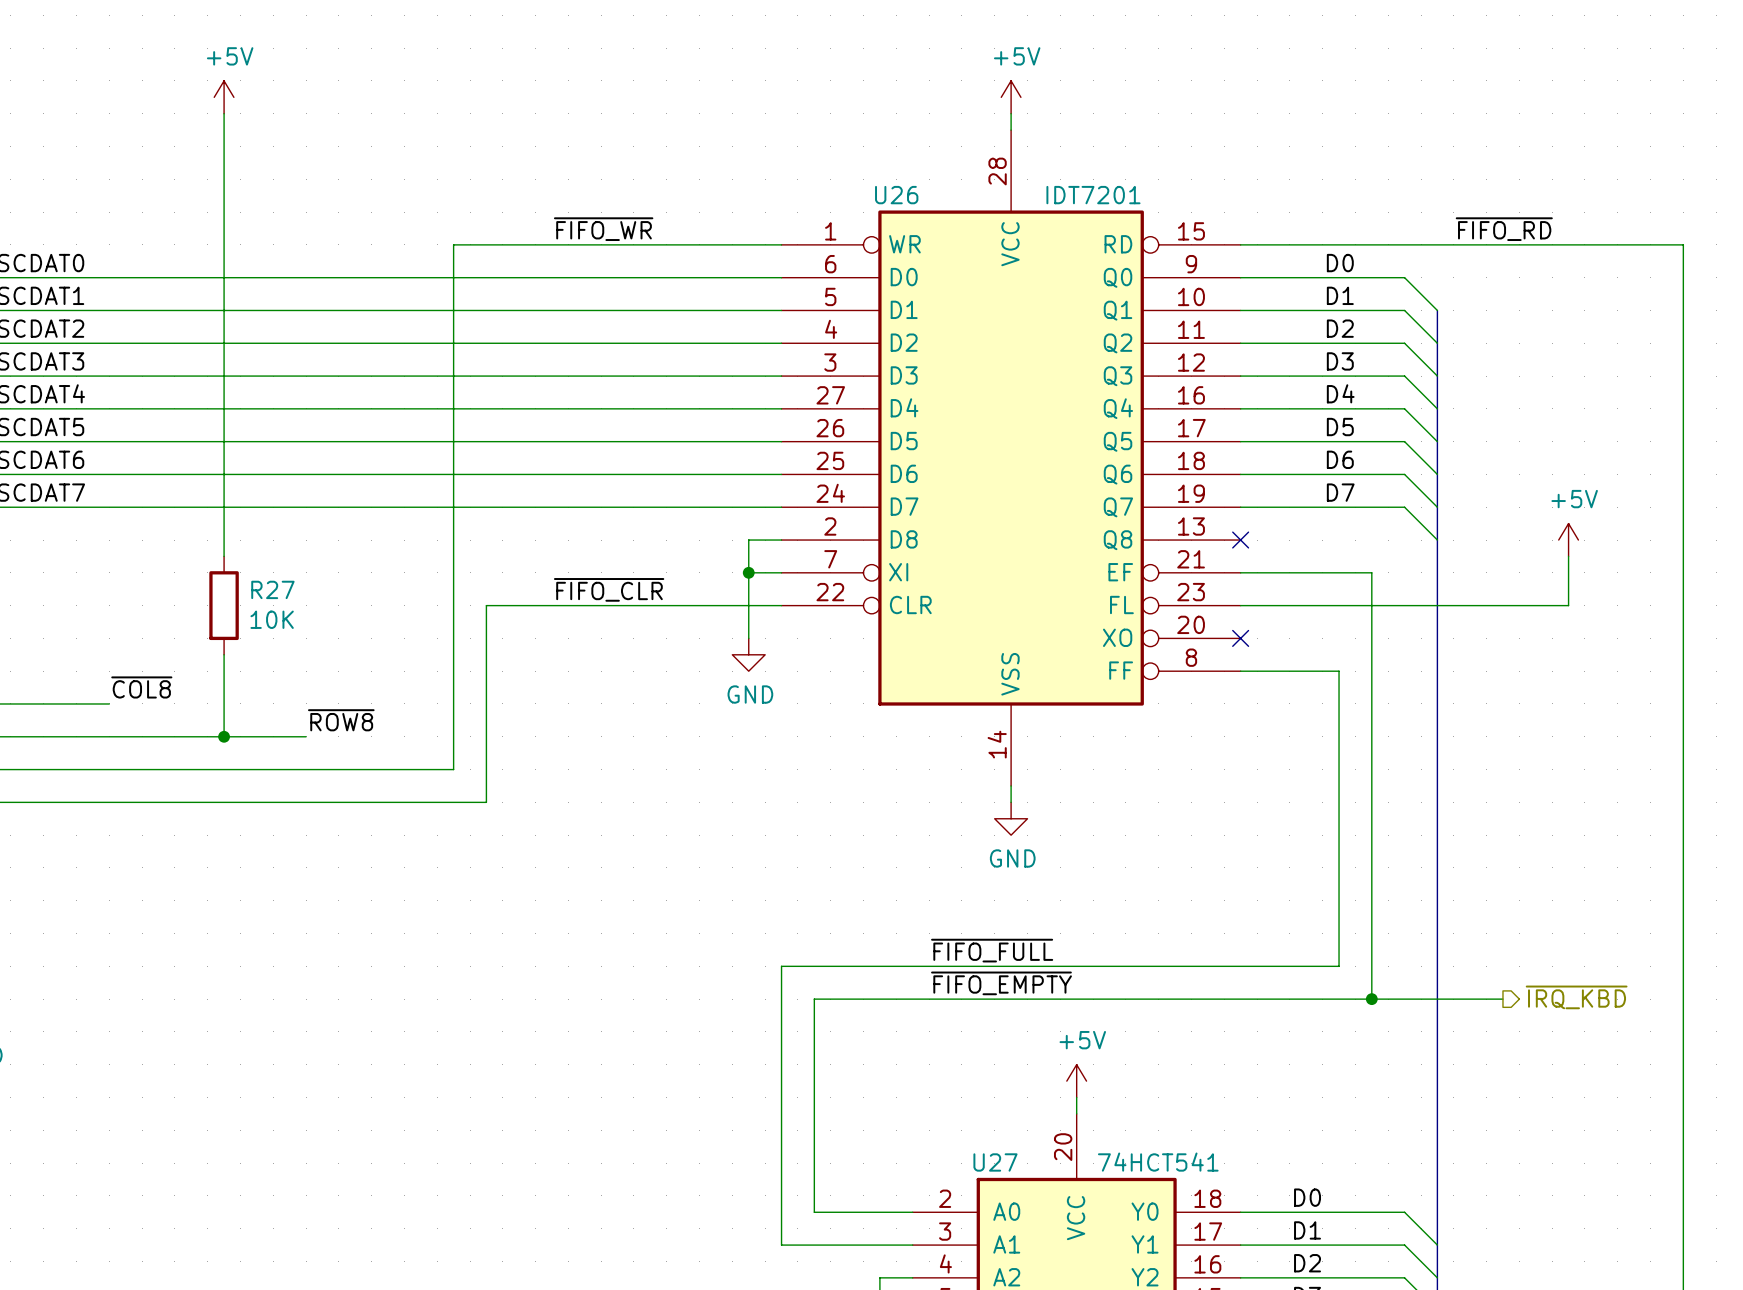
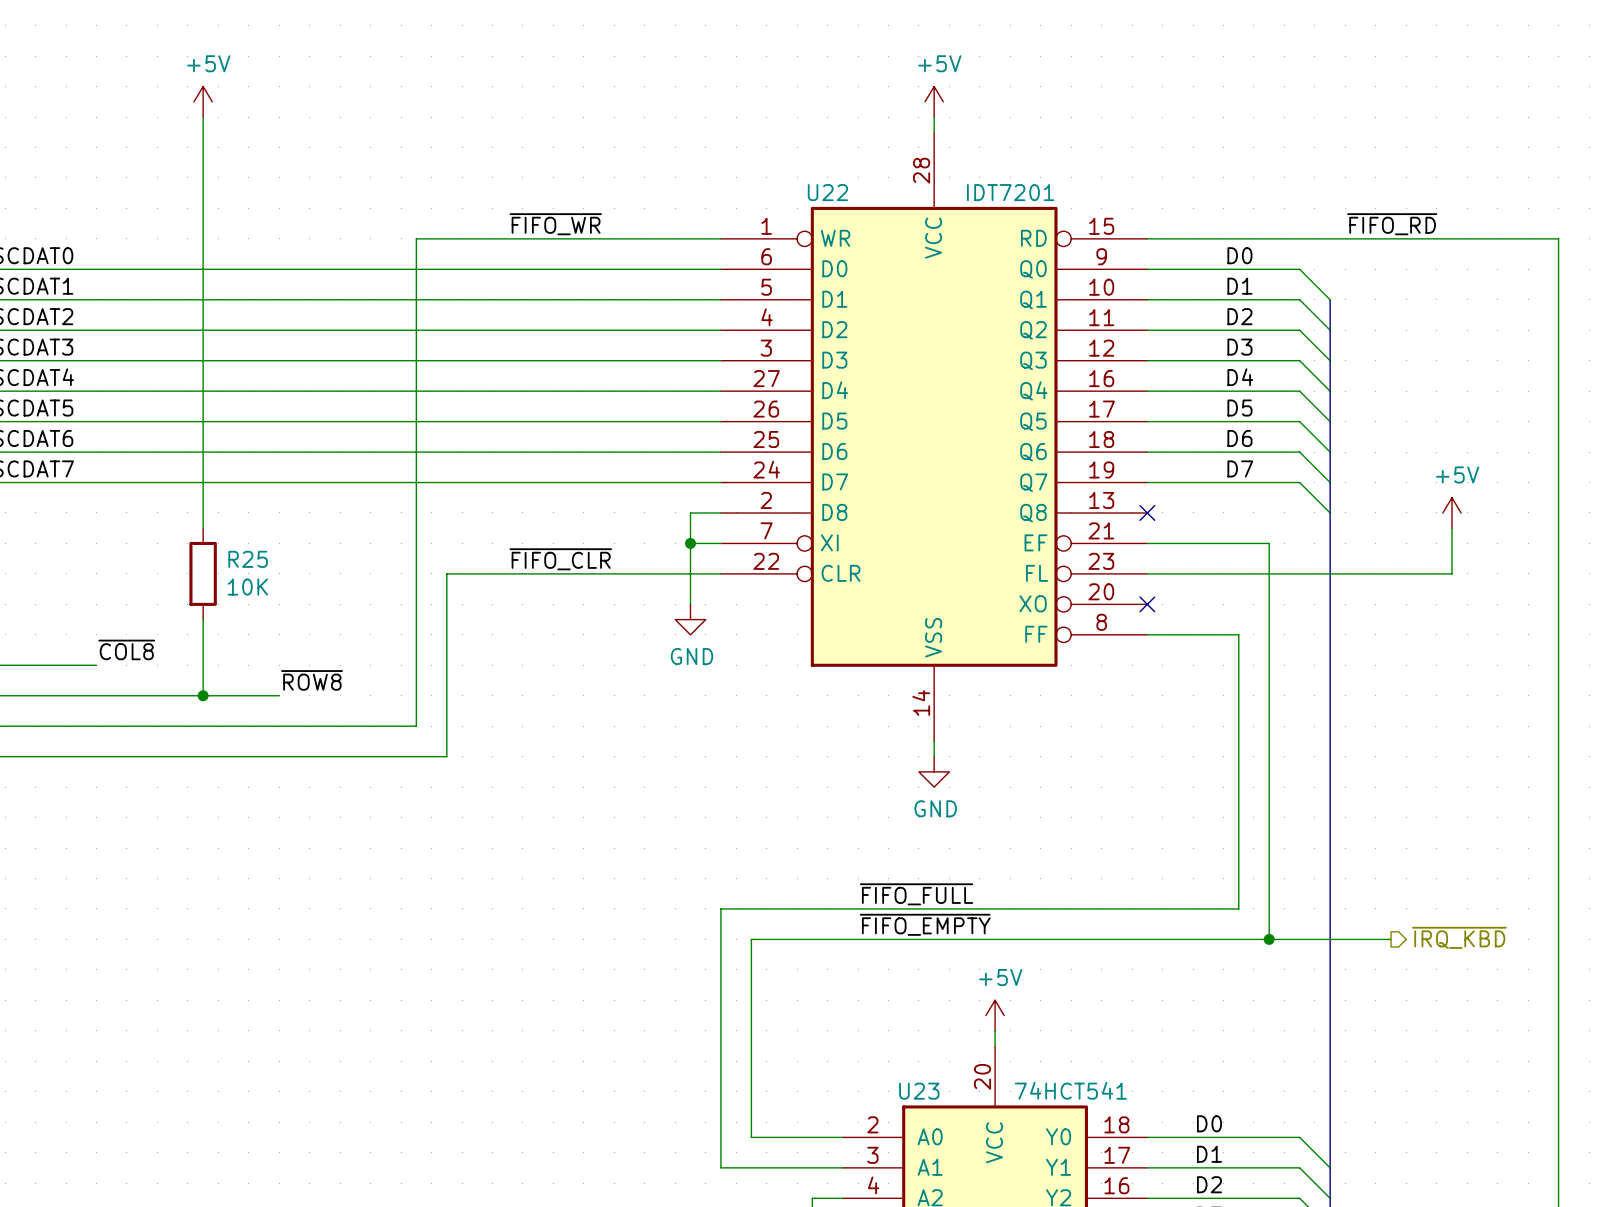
U26 name: U26 (896, 195) -> U22 (827, 192)
R27 name: R27 (272, 589) -> R25 (248, 559)
U27 name: U27 (995, 1162) -> U23 (919, 1091)

